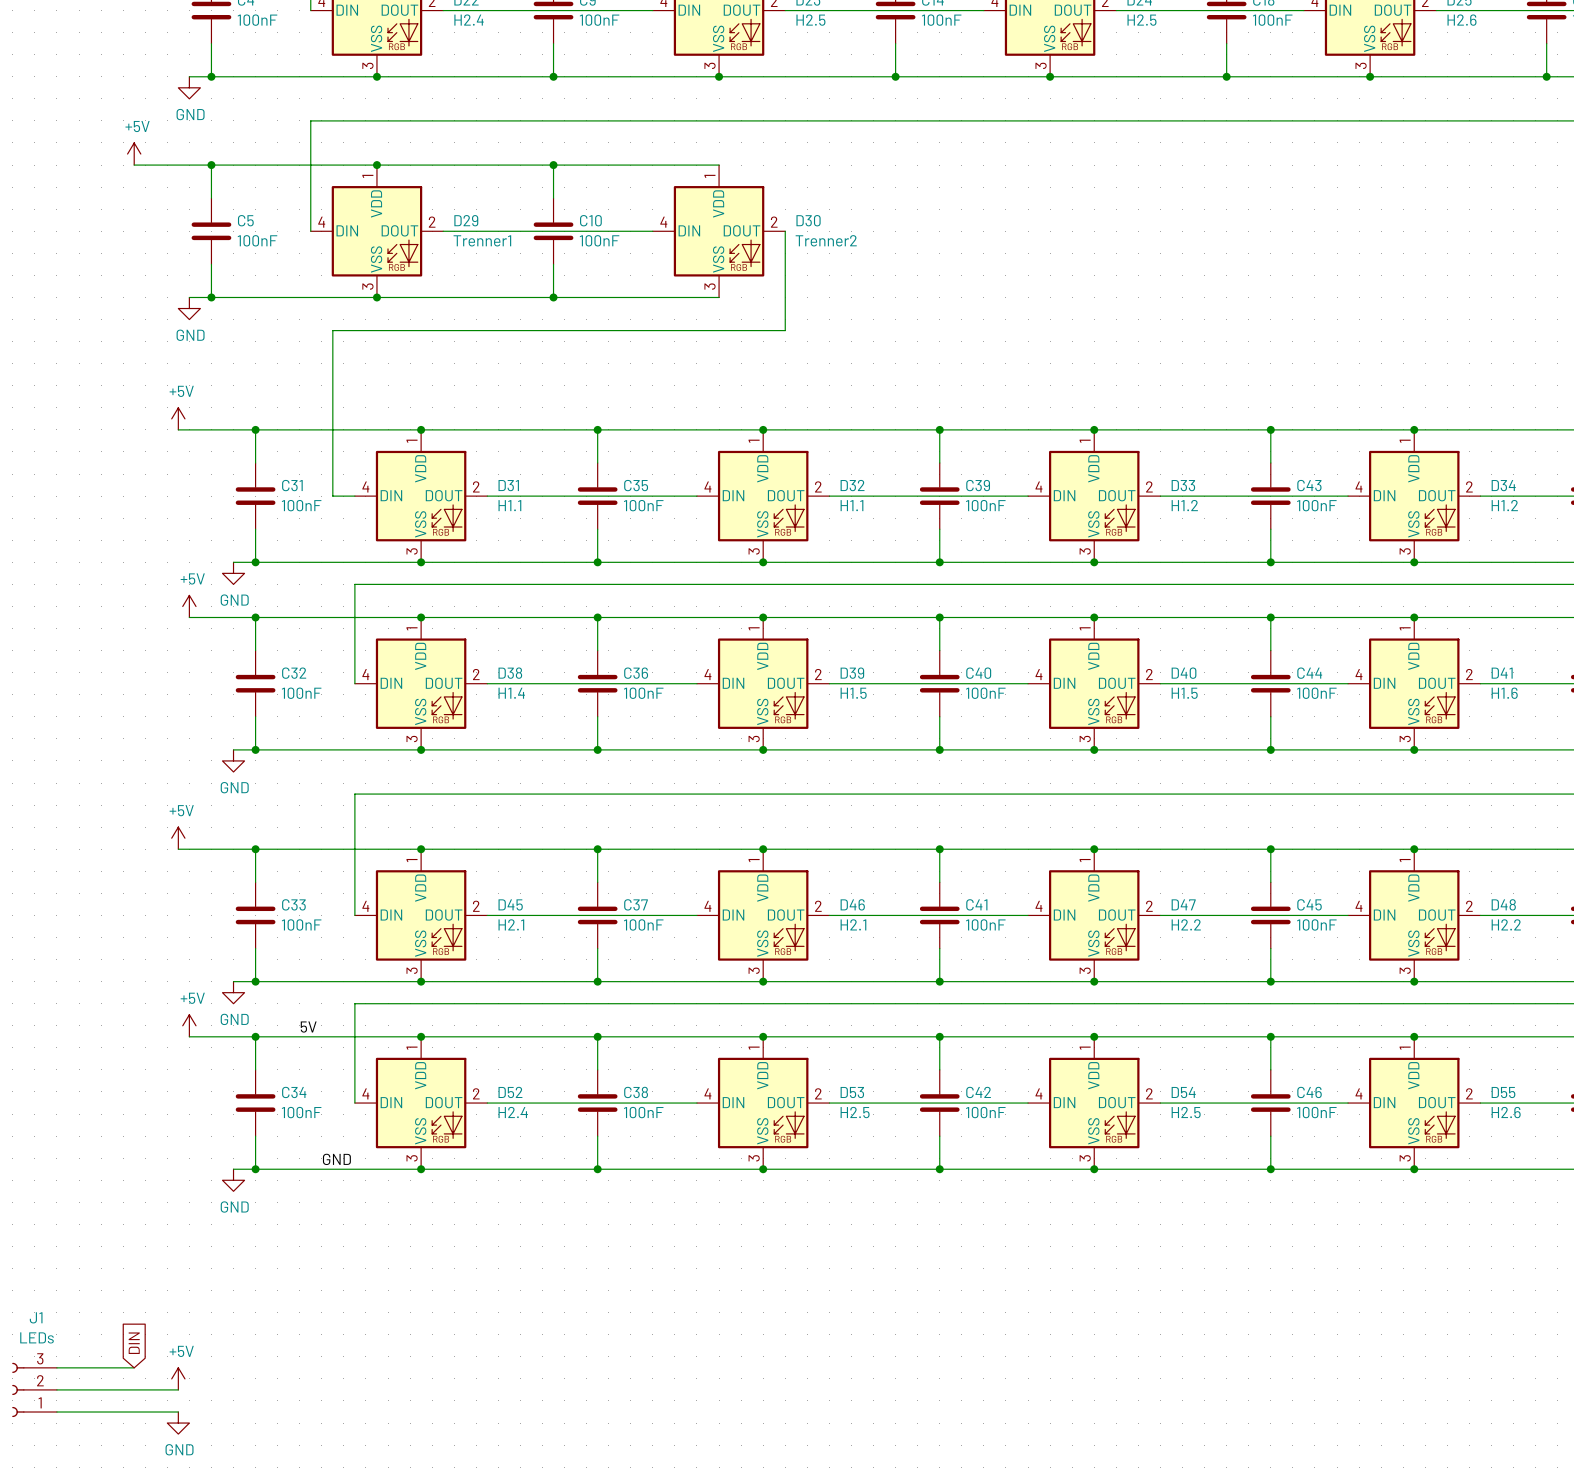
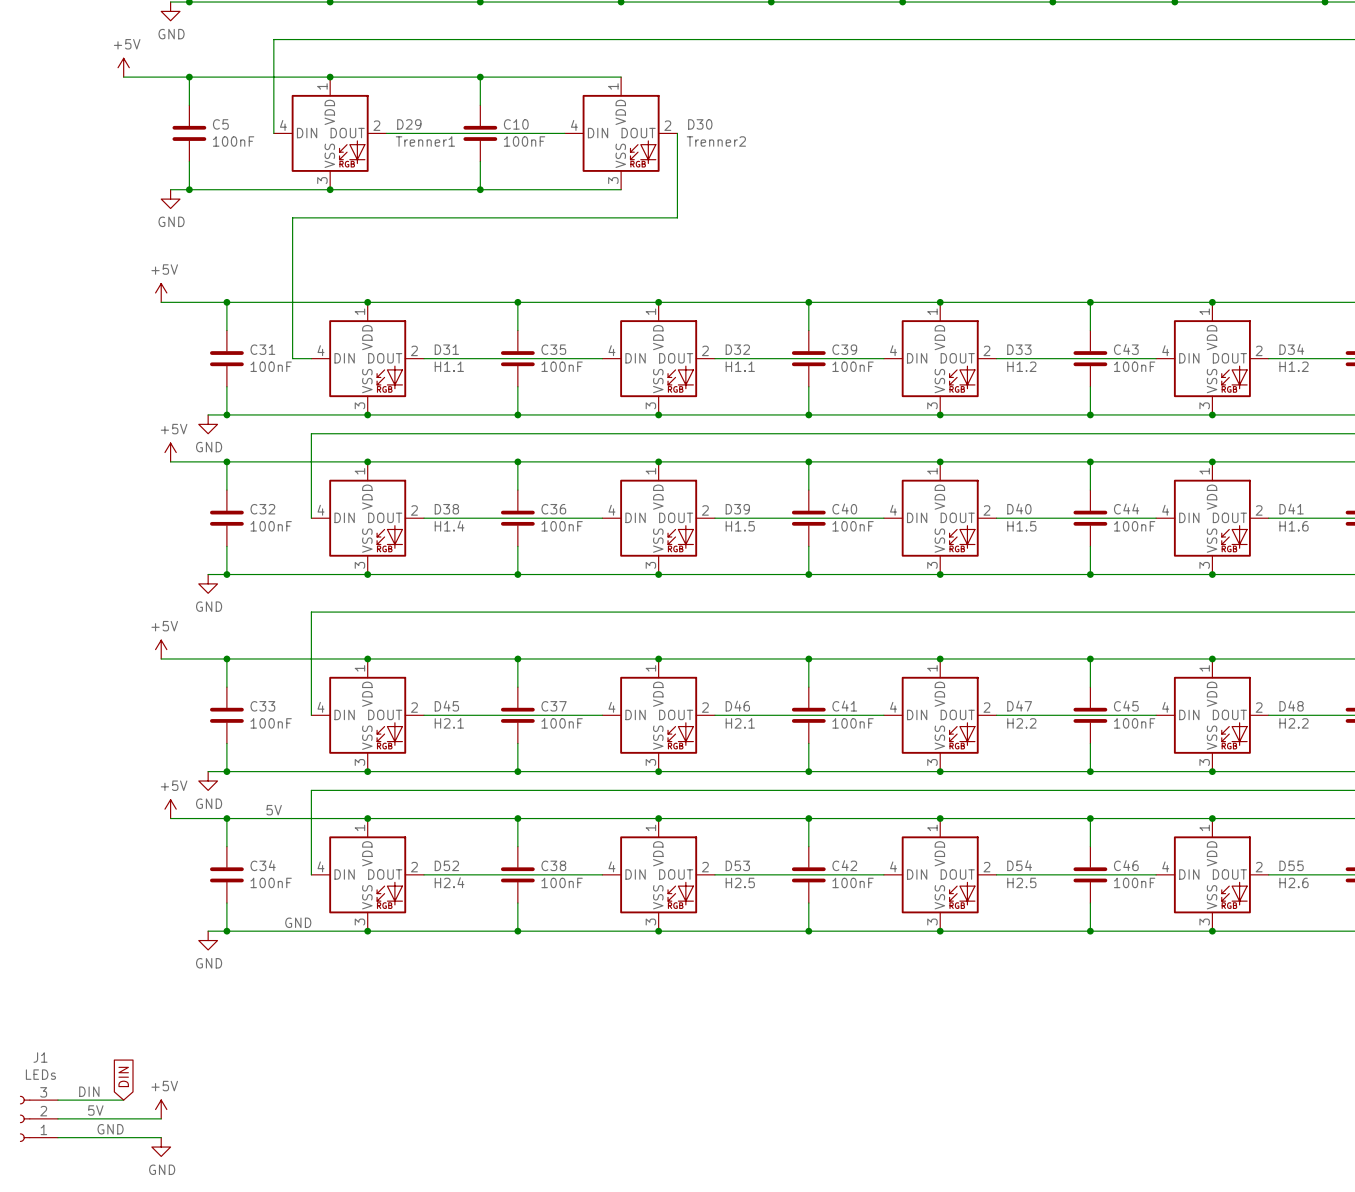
label: none -> DIN (89, 1091)
label: none -> 5V (95, 1110)
label: none -> GND (110, 1129)

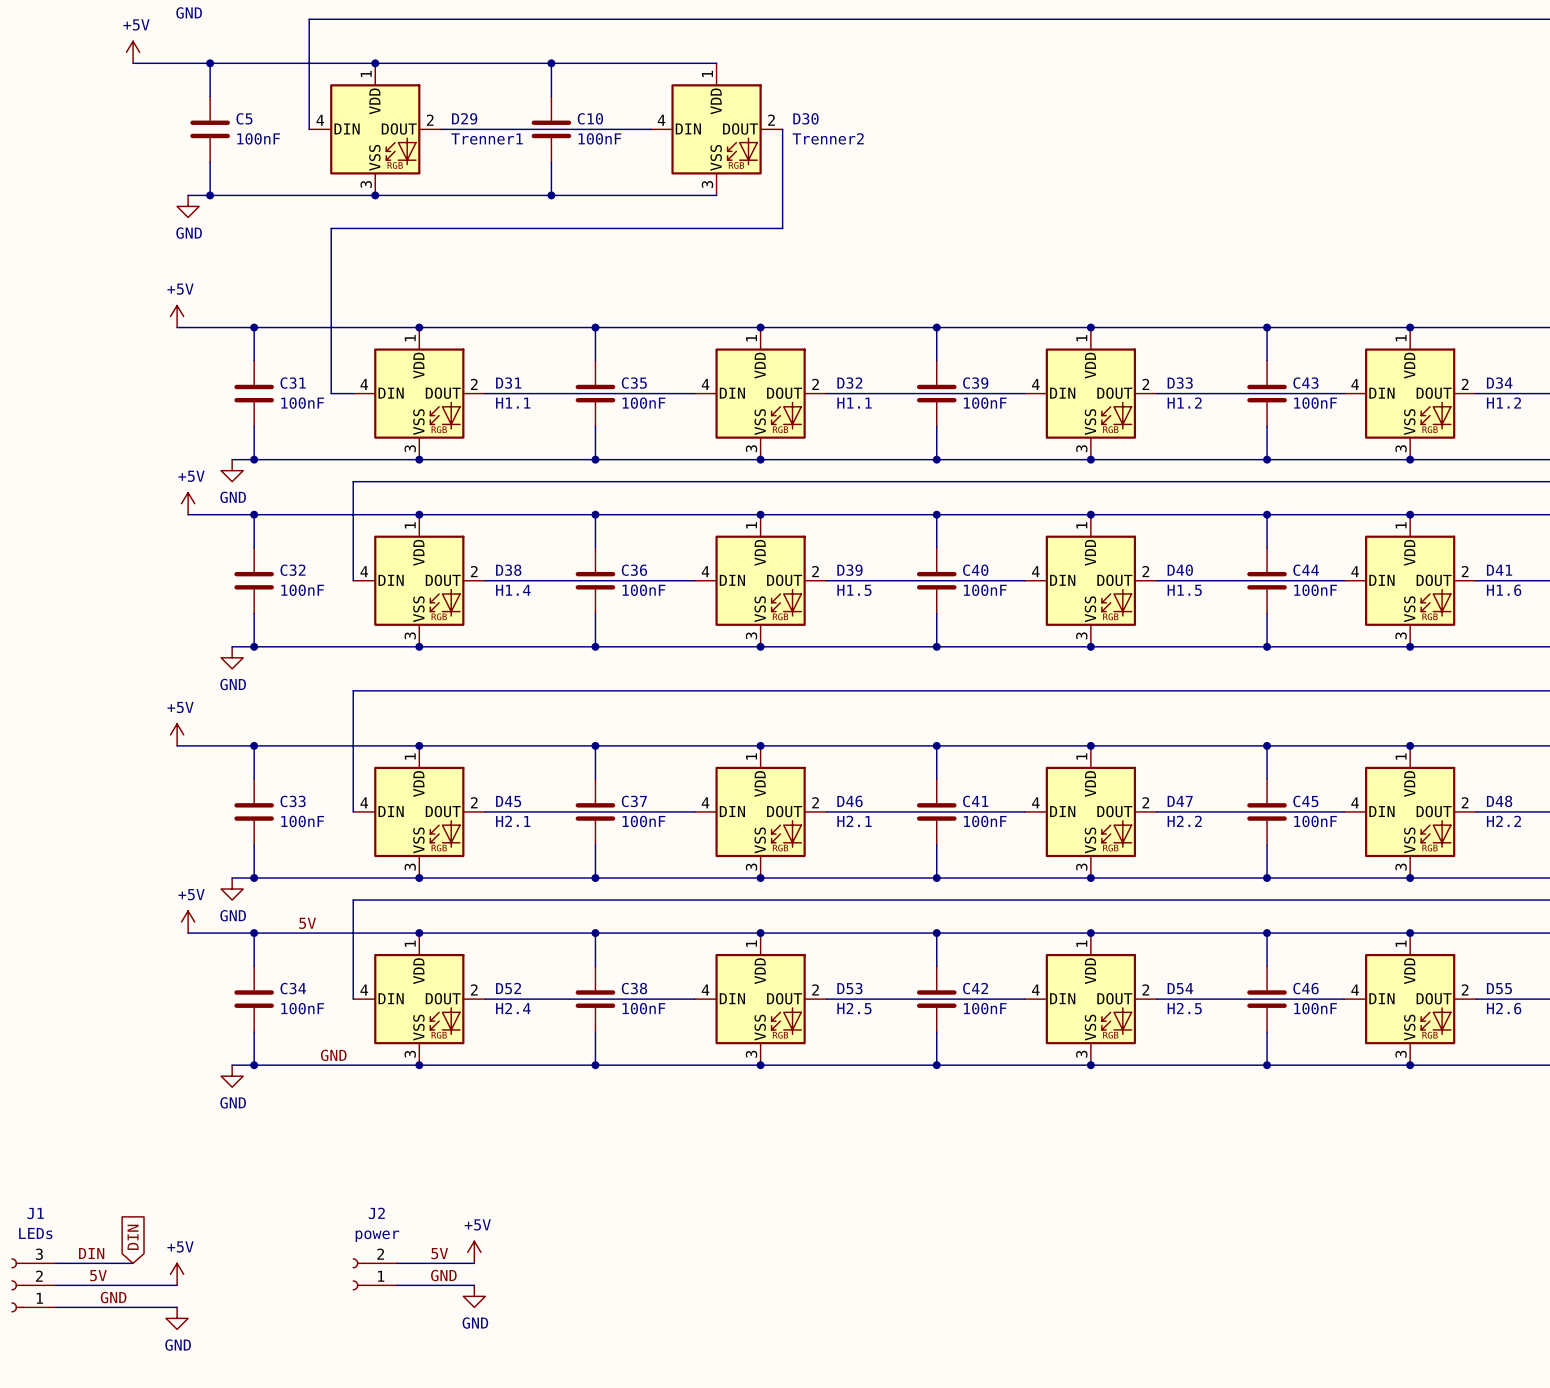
power symbol: none -> +5V (474, 1252)
label: none -> 5V (439, 1253)
wire: none -> (397, 1263) (474, 1263)
J2: none -> power (374, 1274)
label: none -> GND (443, 1275)
wire: none -> (397, 1285) (474, 1285)
power symbol: none -> GND (474, 1296)

